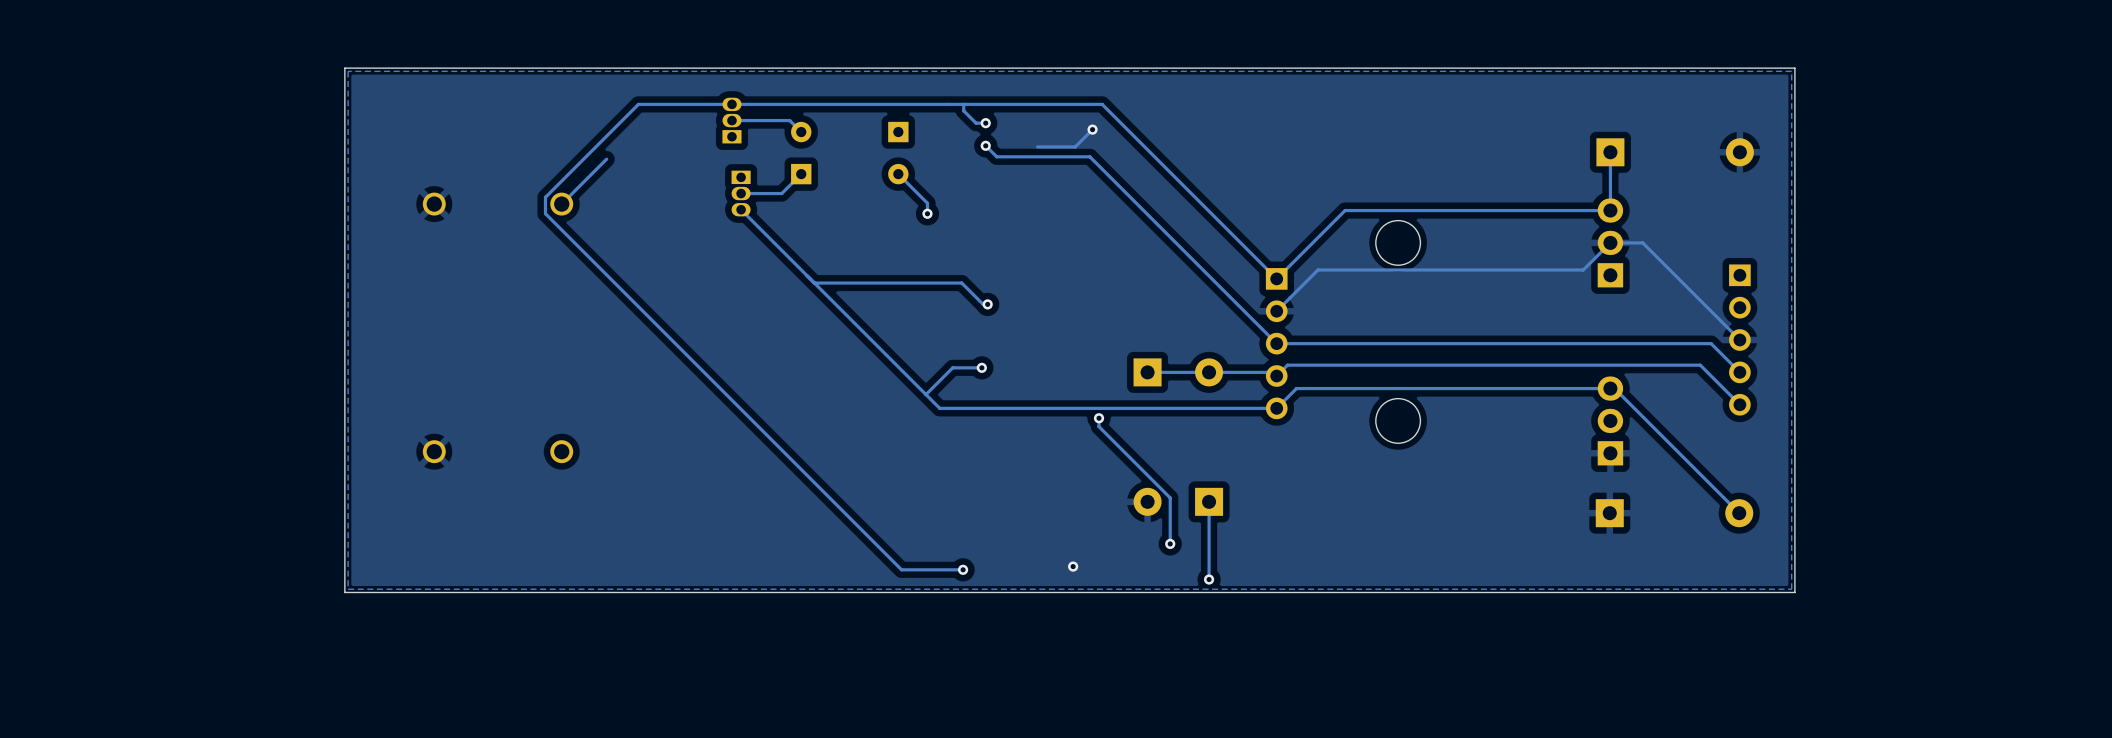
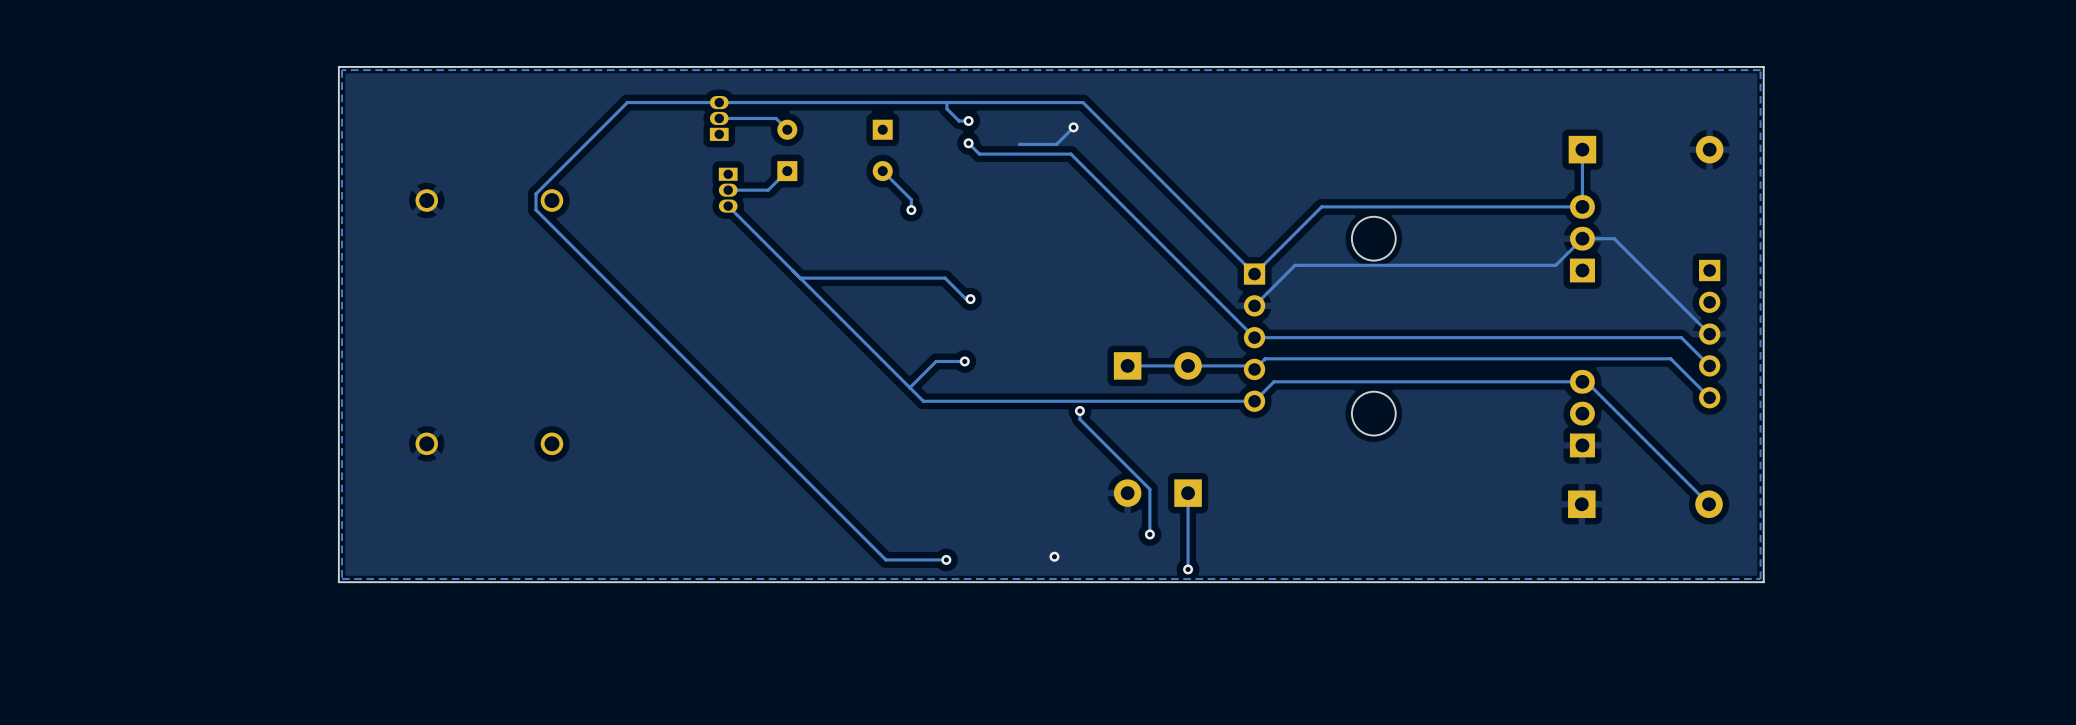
track: (606, 159) (561, 204) -> none

